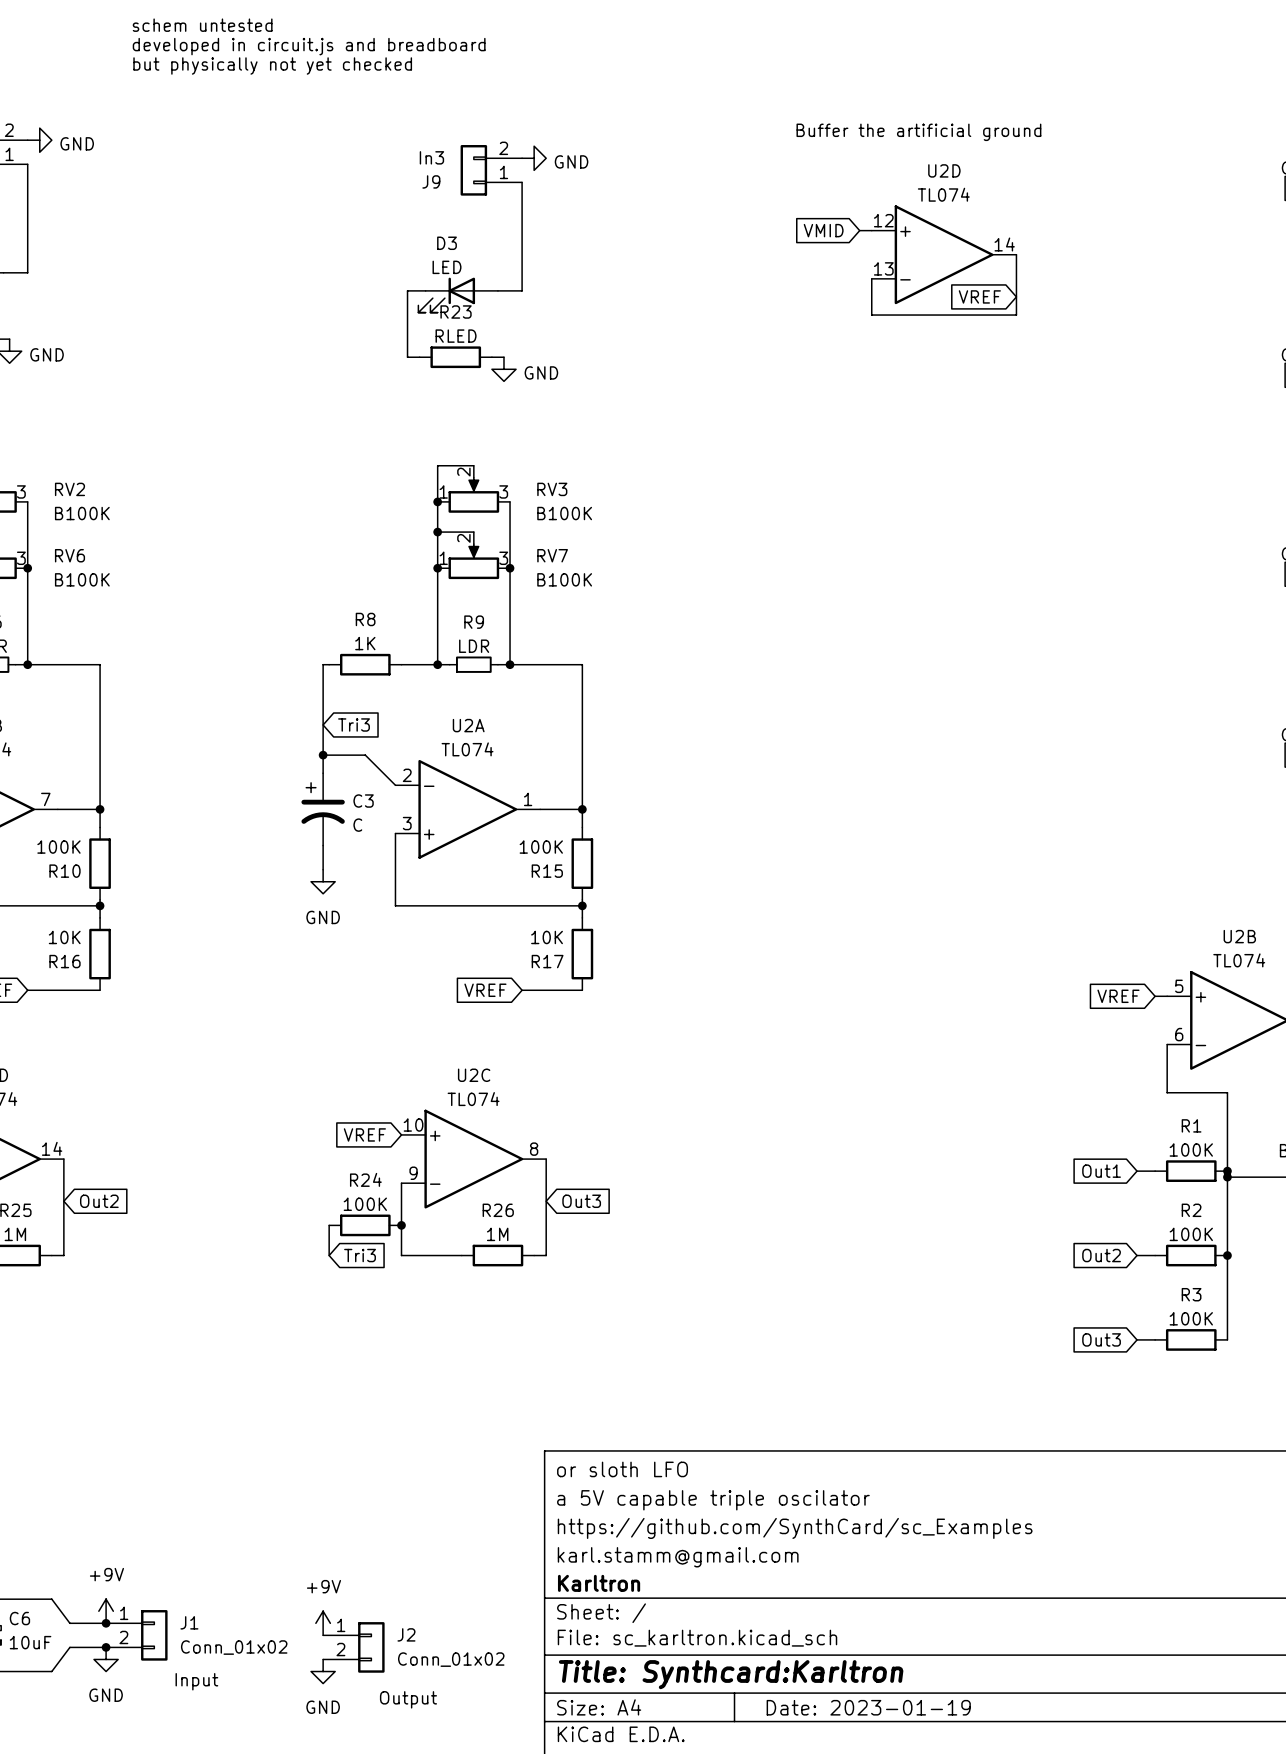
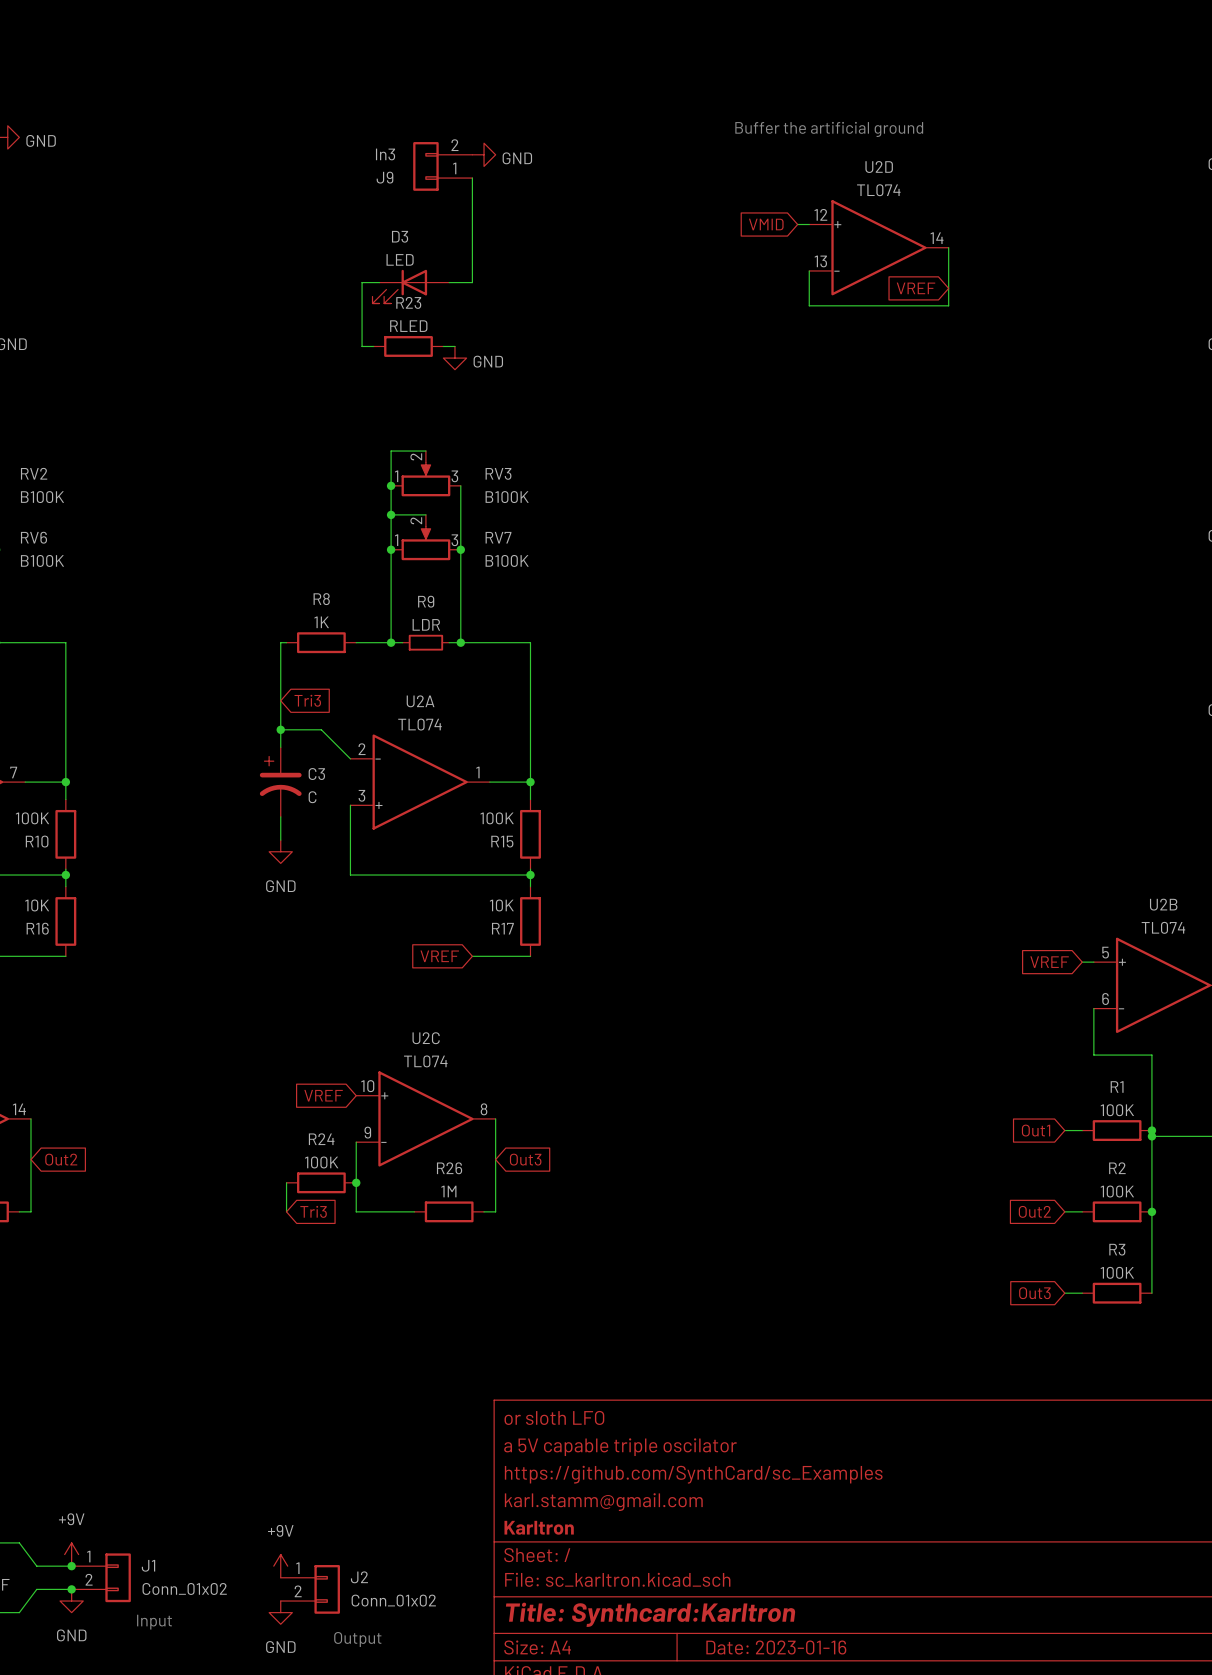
text: schem untested (202, 25) -> none
text: developed in circuit.js and breadboard (309, 46) -> none
text: but physically not yet checked (272, 66) -> none
title block: Date: 2023-01-19 (868, 1707) -> Date: 2023-01-16 (776, 1647)

